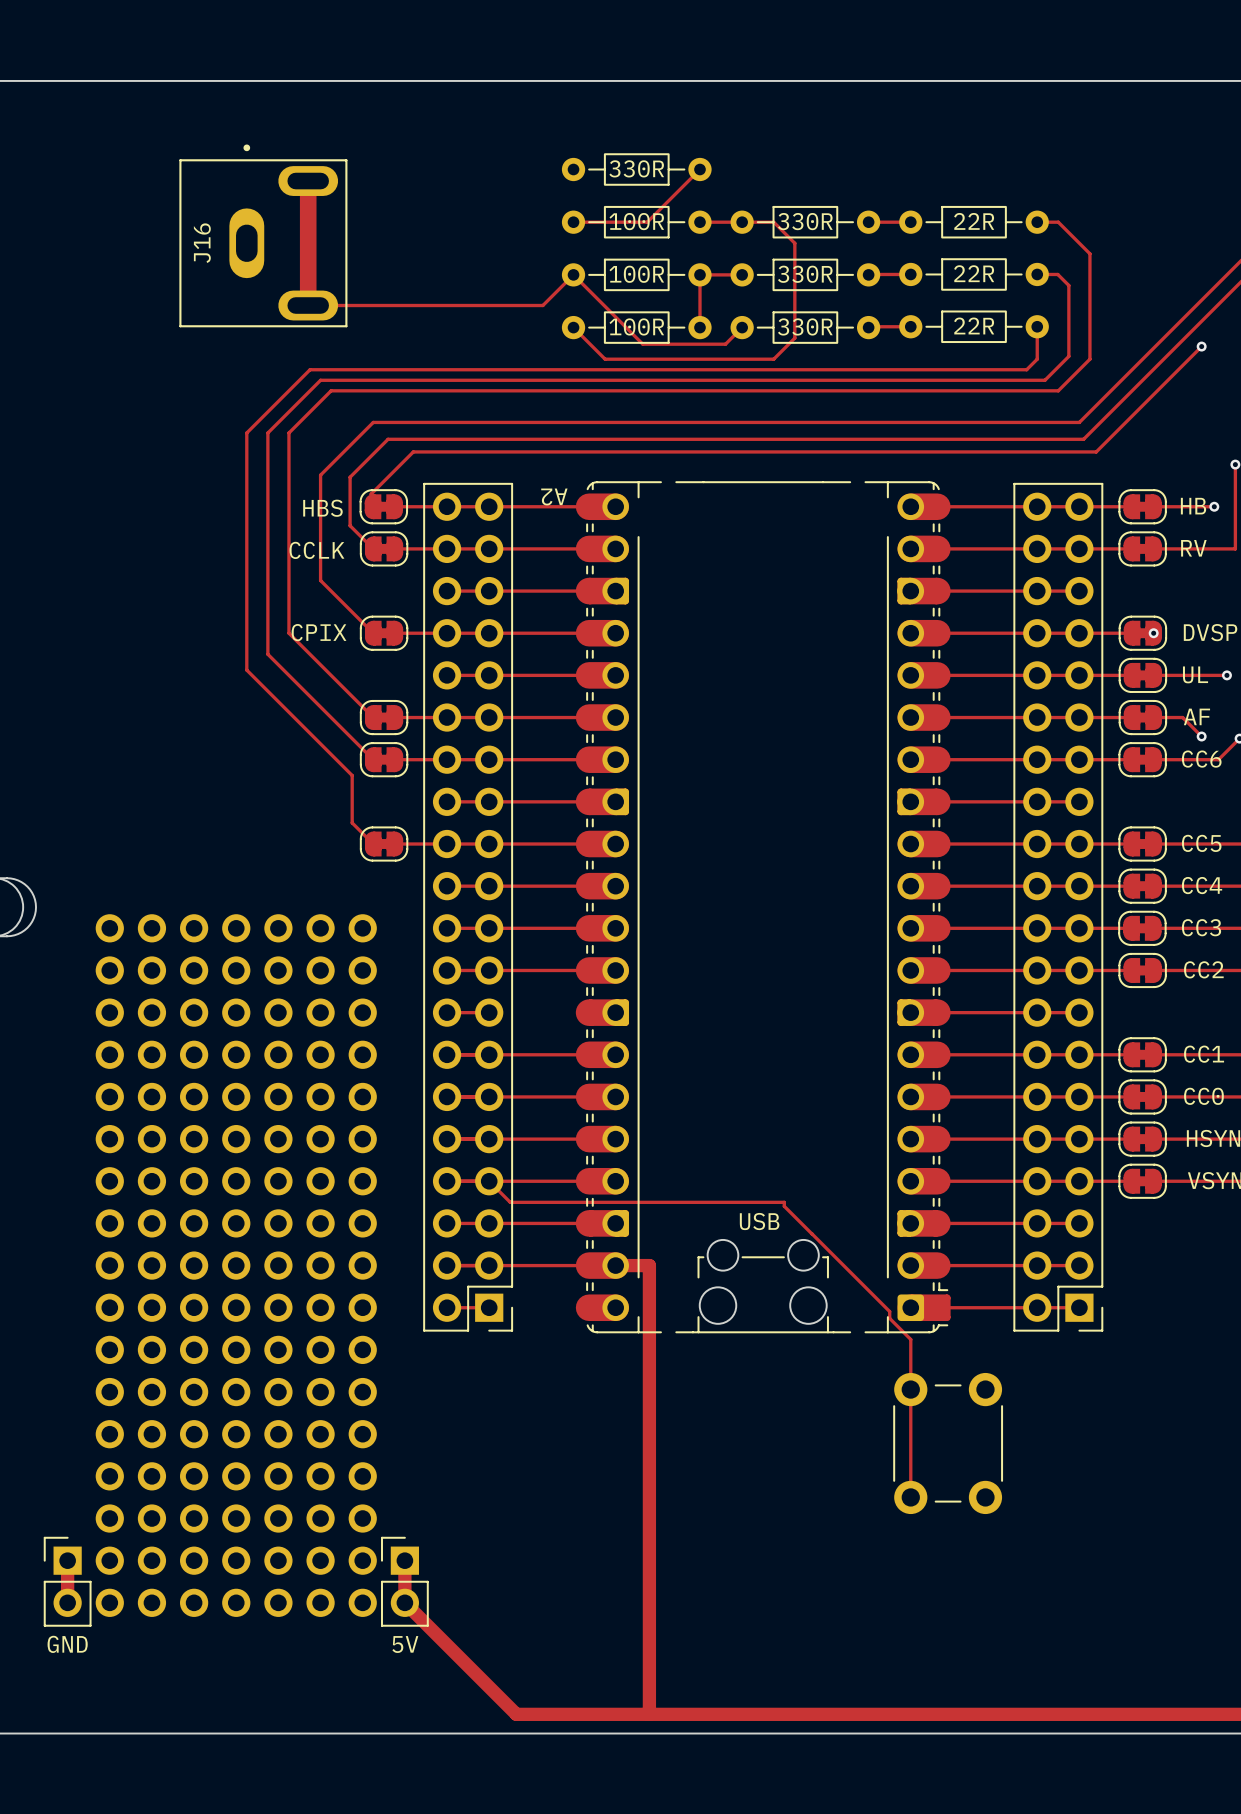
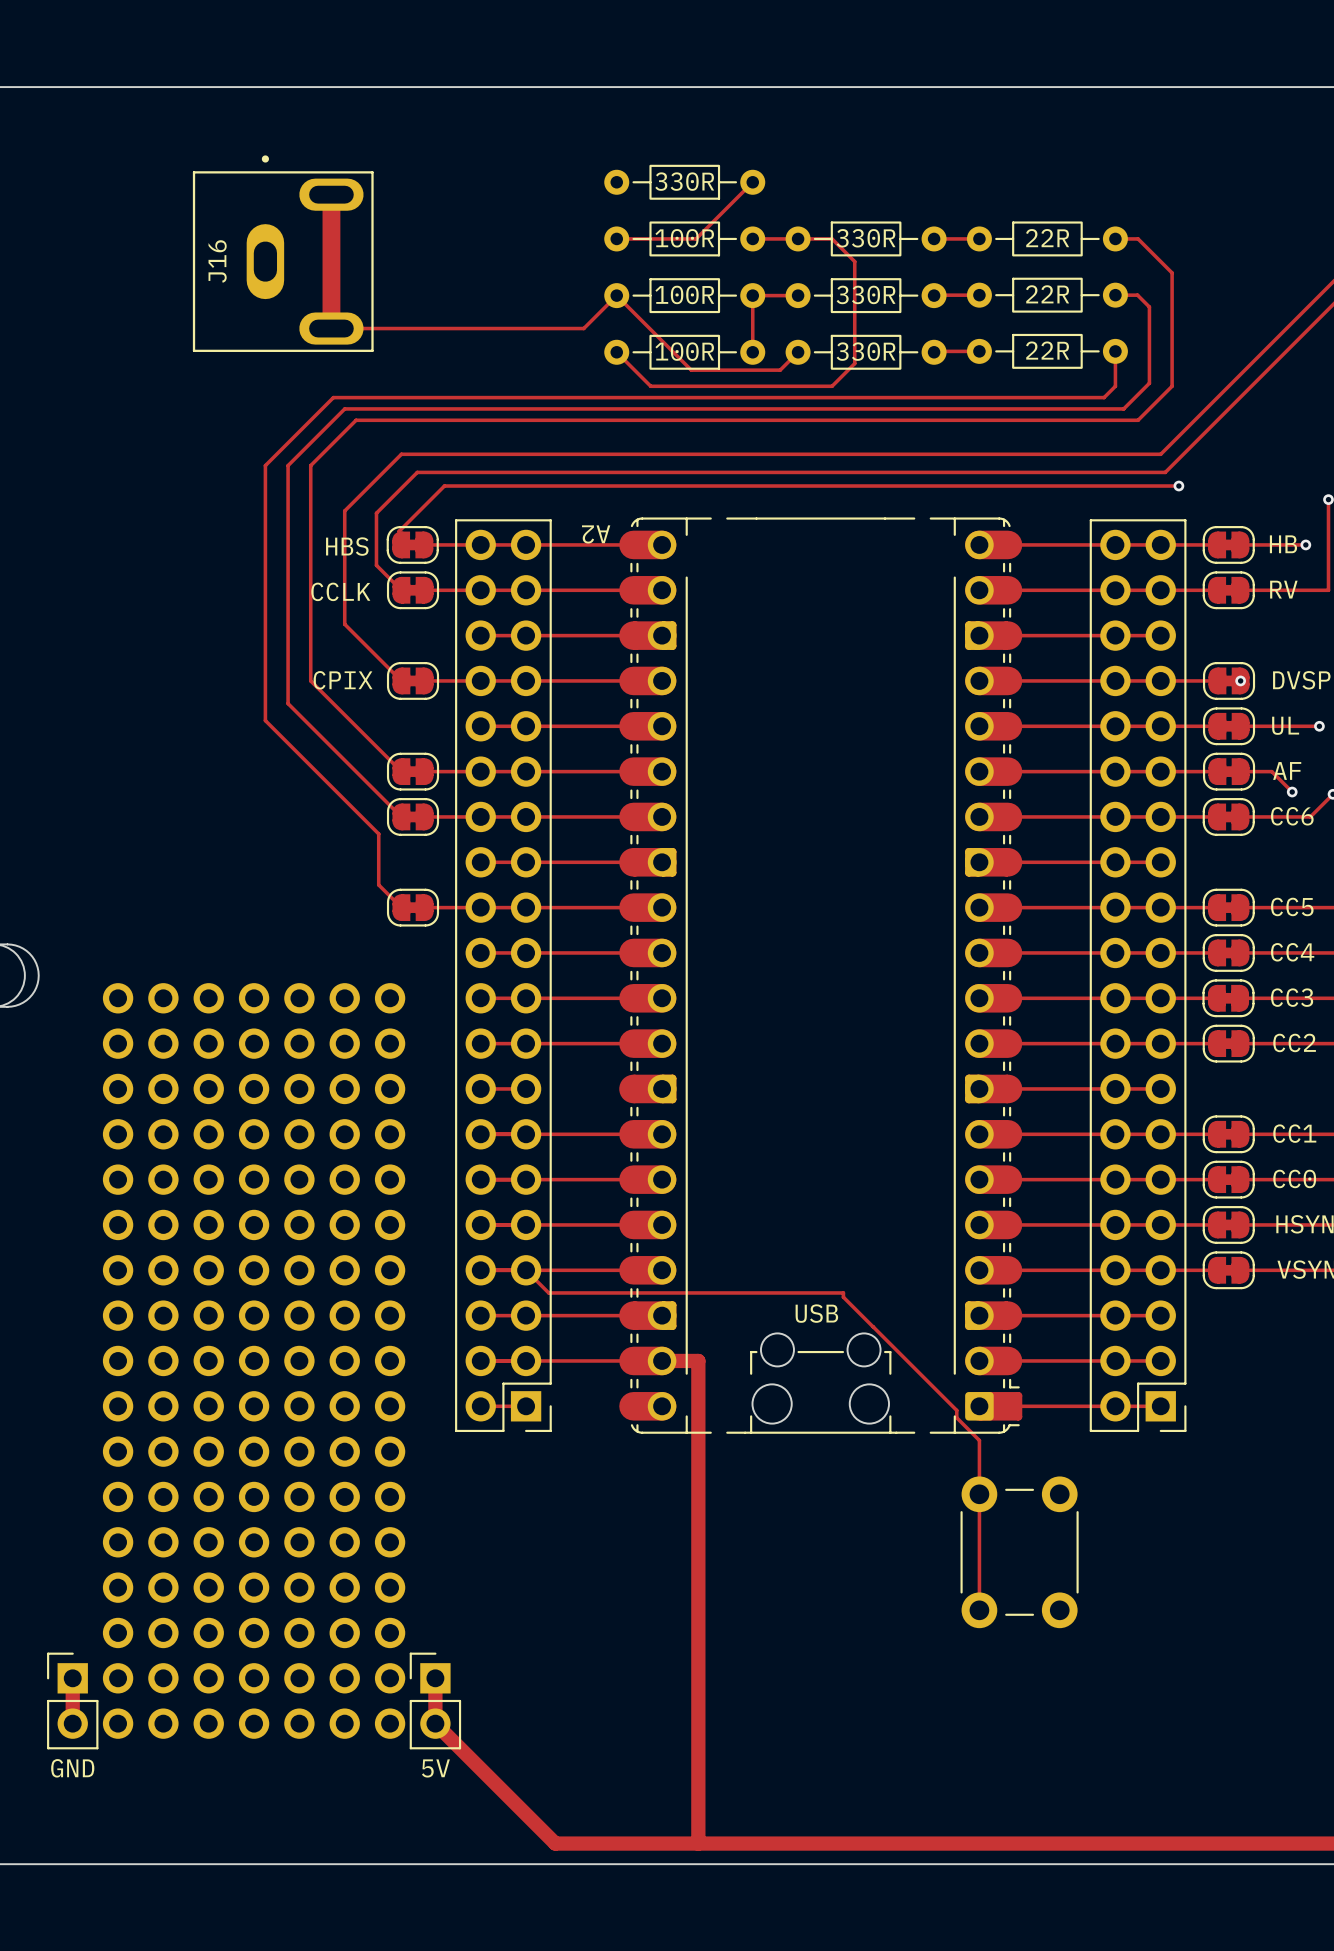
track: (1201, 346) (1096, 451) -> none
via: (1201, 346) -> none
via: none -> (1178, 486)

